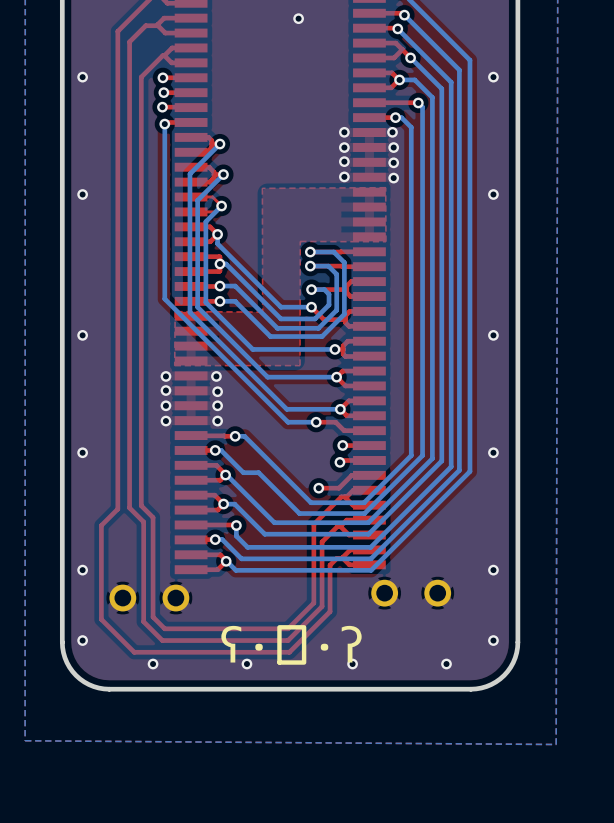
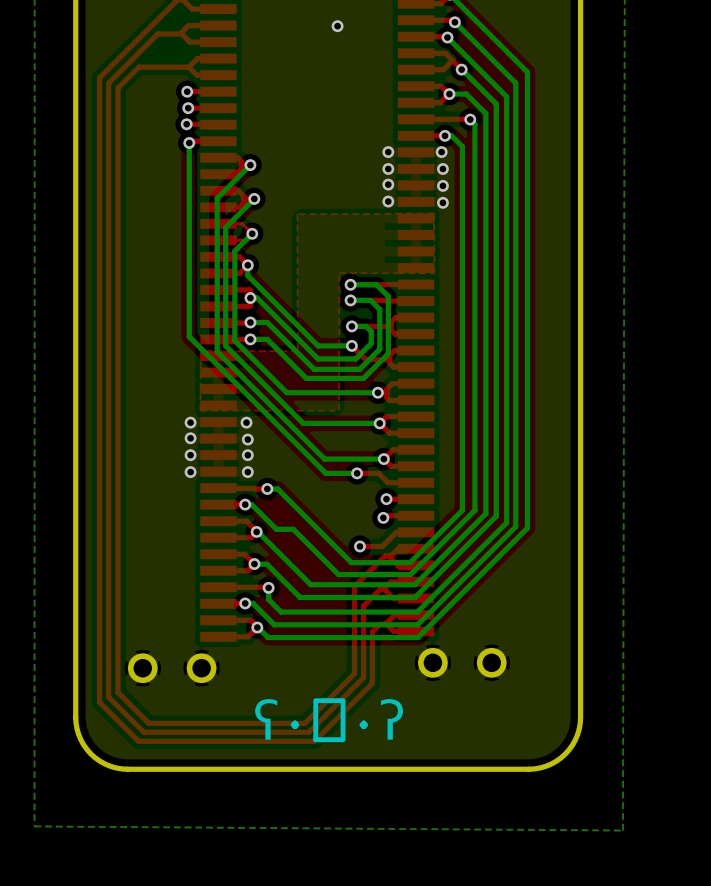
top track: (145, 25) (129, 41) (129, 507) (143, 521) (143, 621) (162, 640) (288, 640) -> (168, 33) (157, 33) (108, 83) (108, 697) (143, 732) (308, 732) (325, 715)
top track: (117, 31) (117, 509) (101, 525) (101, 619) (134, 652) (289, 652) -> (137, 40) (99, 77) (99, 702) (138, 741) (314, 741) (327, 728)
top track: (162, 55) (141, 77) (141, 505) (153, 517) (153, 617) (164, 628) (288, 628) -> (187, 67) (138, 67) (118, 88) (118, 692) (148, 723) (304, 723) (325, 702)
via: (82, 77) -> none
via: (493, 77) -> none
via: (82, 194) -> none
via: (493, 194) -> none
via: (82, 335) -> none
via: (493, 335) -> none
via: (82, 452) -> none
via: (493, 452) -> none
via: (82, 570) -> none
via: (493, 570) -> none
via: (82, 640) -> none
via: (493, 640) -> none
via: (153, 664) -> none
via: (246, 664) -> none
via: (352, 664) -> none
via: (446, 664) -> none

